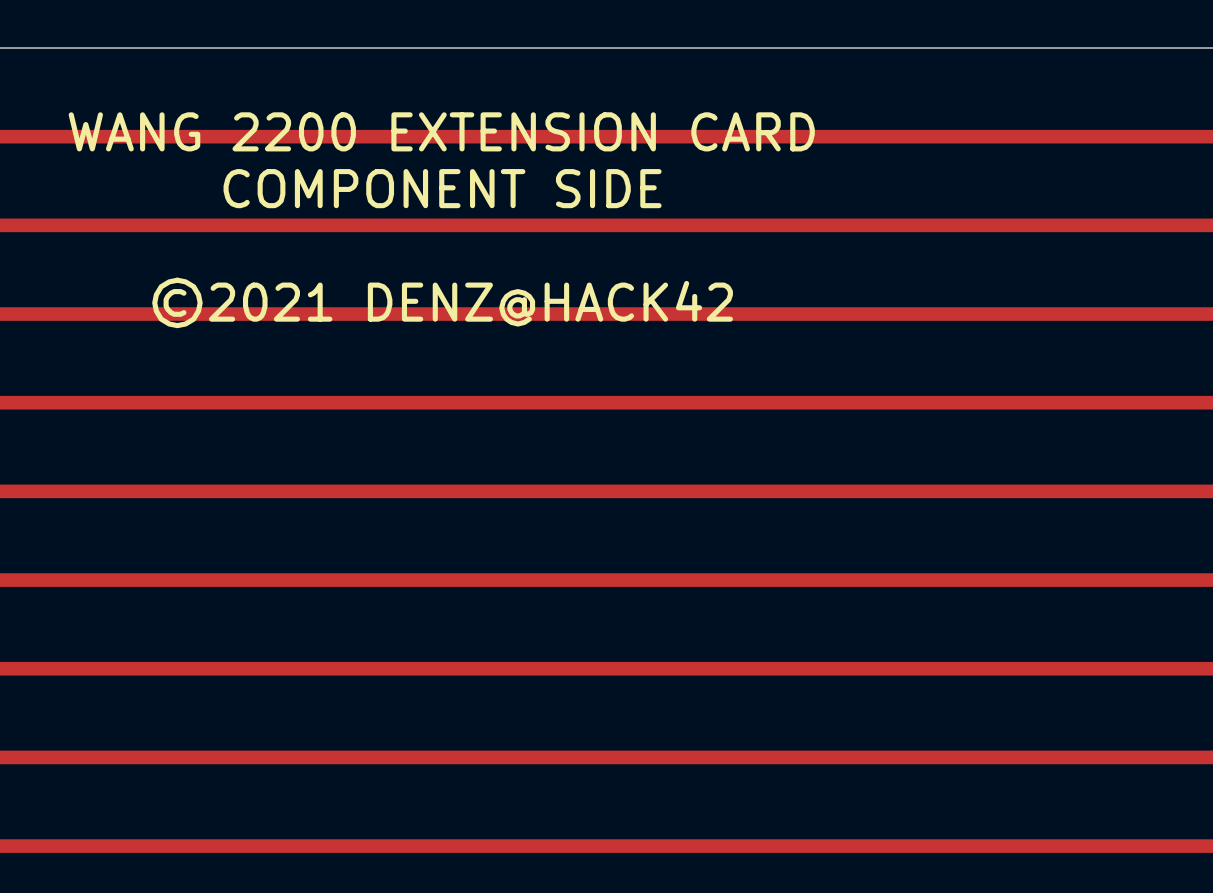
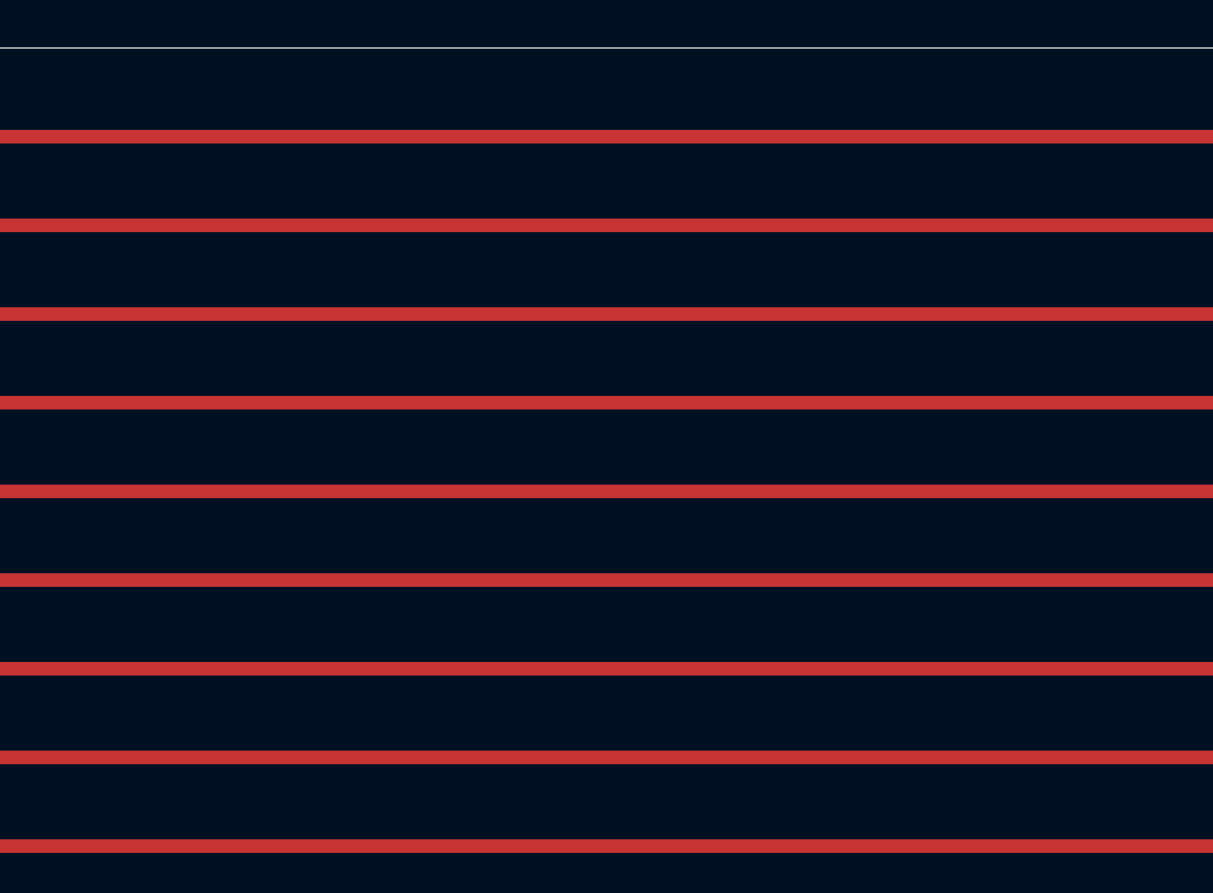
text: WANG 2200 EXTENSION CARD (441, 131) -> none
text: COMPONENT SIDE (442, 188) -> none
text: ©2021 DENZ@HACK42 (442, 302) -> none

